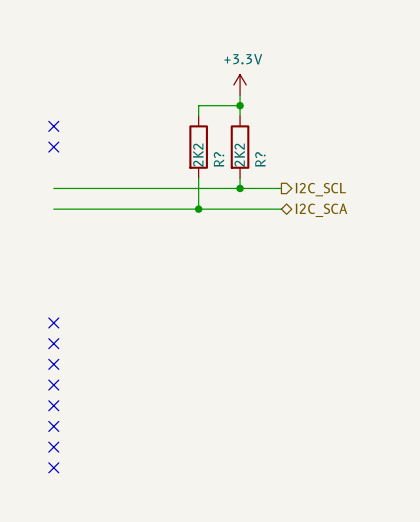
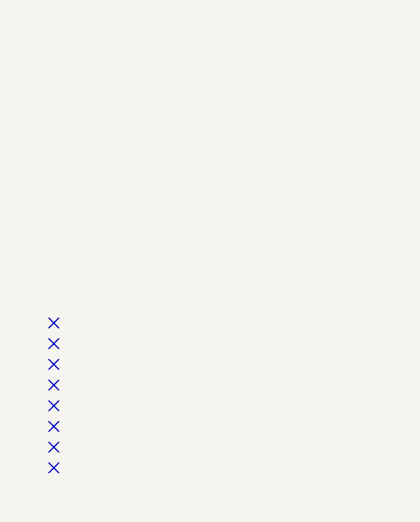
power symbol: +3.3V (240, 84) -> none
wire: (240, 95) (240, 116) -> none
wire: (240, 105) (198, 105) (198, 116) -> none
junction: (240, 105) -> none
no-connect mark: (53, 126) -> none
no-connect mark: (53, 147) -> none
R?: 2K2 (198, 147) -> none
R?: 2K2 (240, 147) -> none
wire: (198, 178) (198, 209) -> none
wire: (240, 178) (240, 188) -> none
wire: (53, 188) (281, 188) -> none
junction: (240, 188) -> none
hierarchical label: I2C_SCL (320, 189) -> none
wire: (53, 209) (281, 209) -> none
junction: (198, 209) -> none
hierarchical label: I2C_SCA (321, 210) -> none

